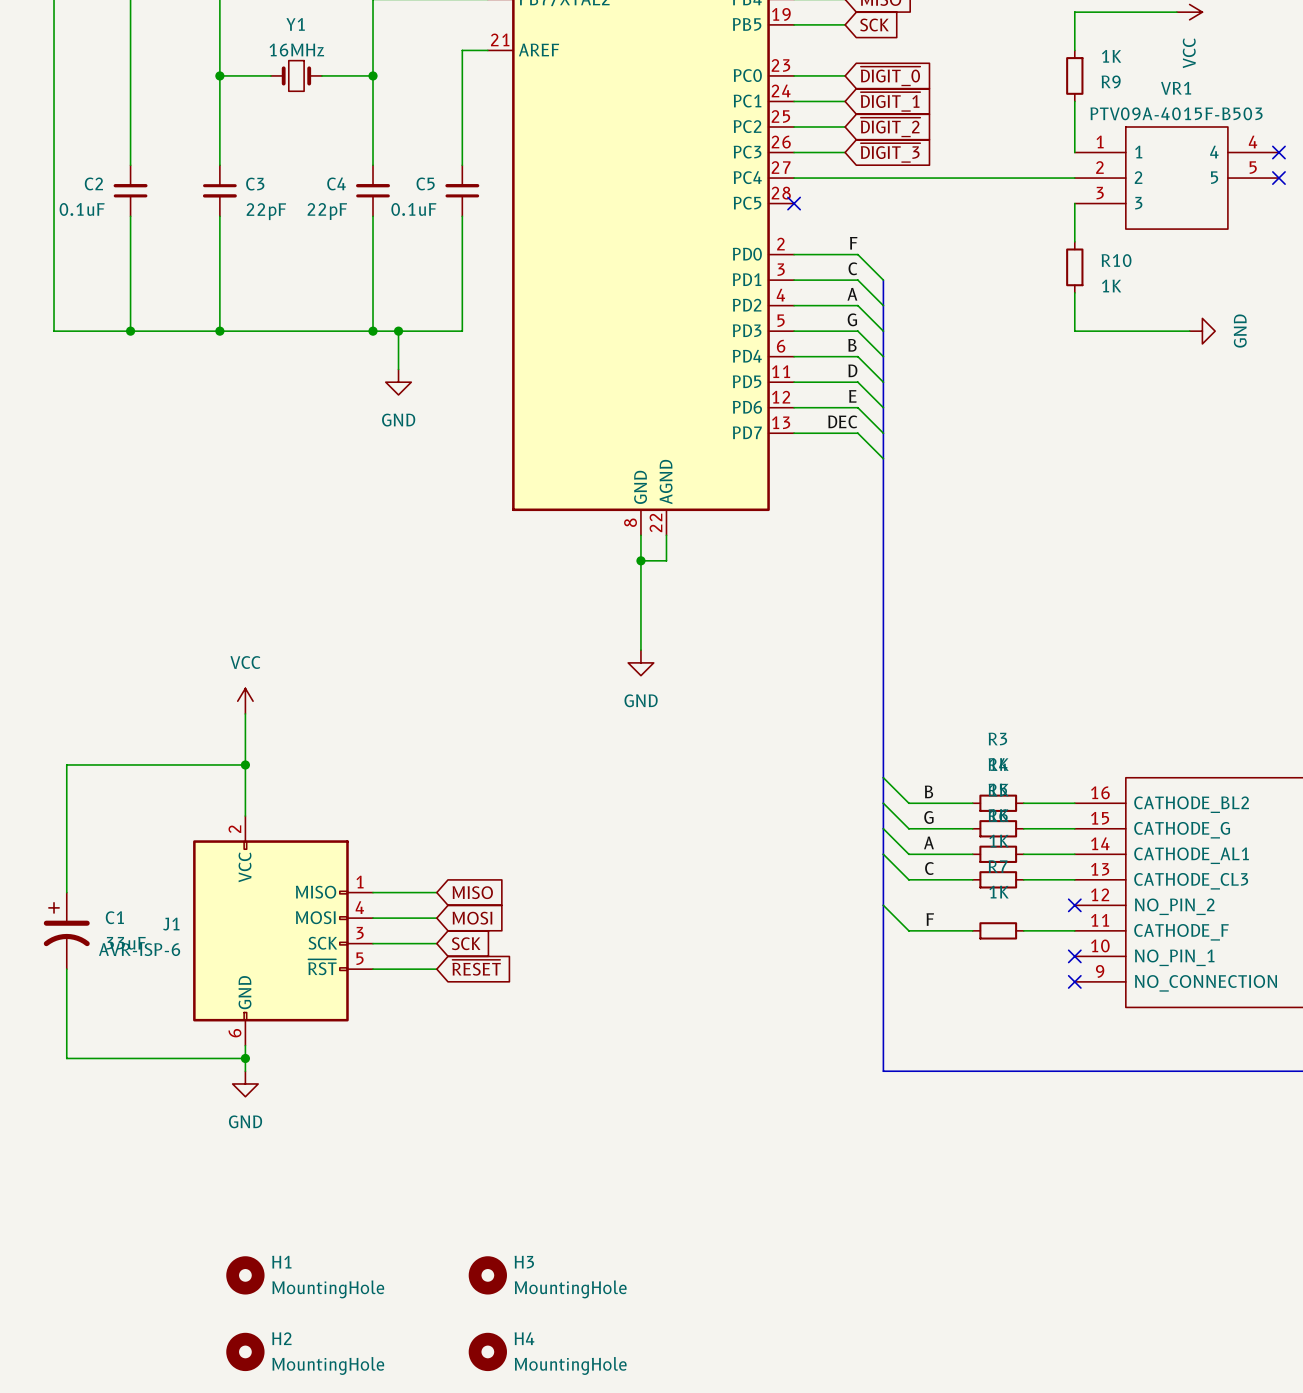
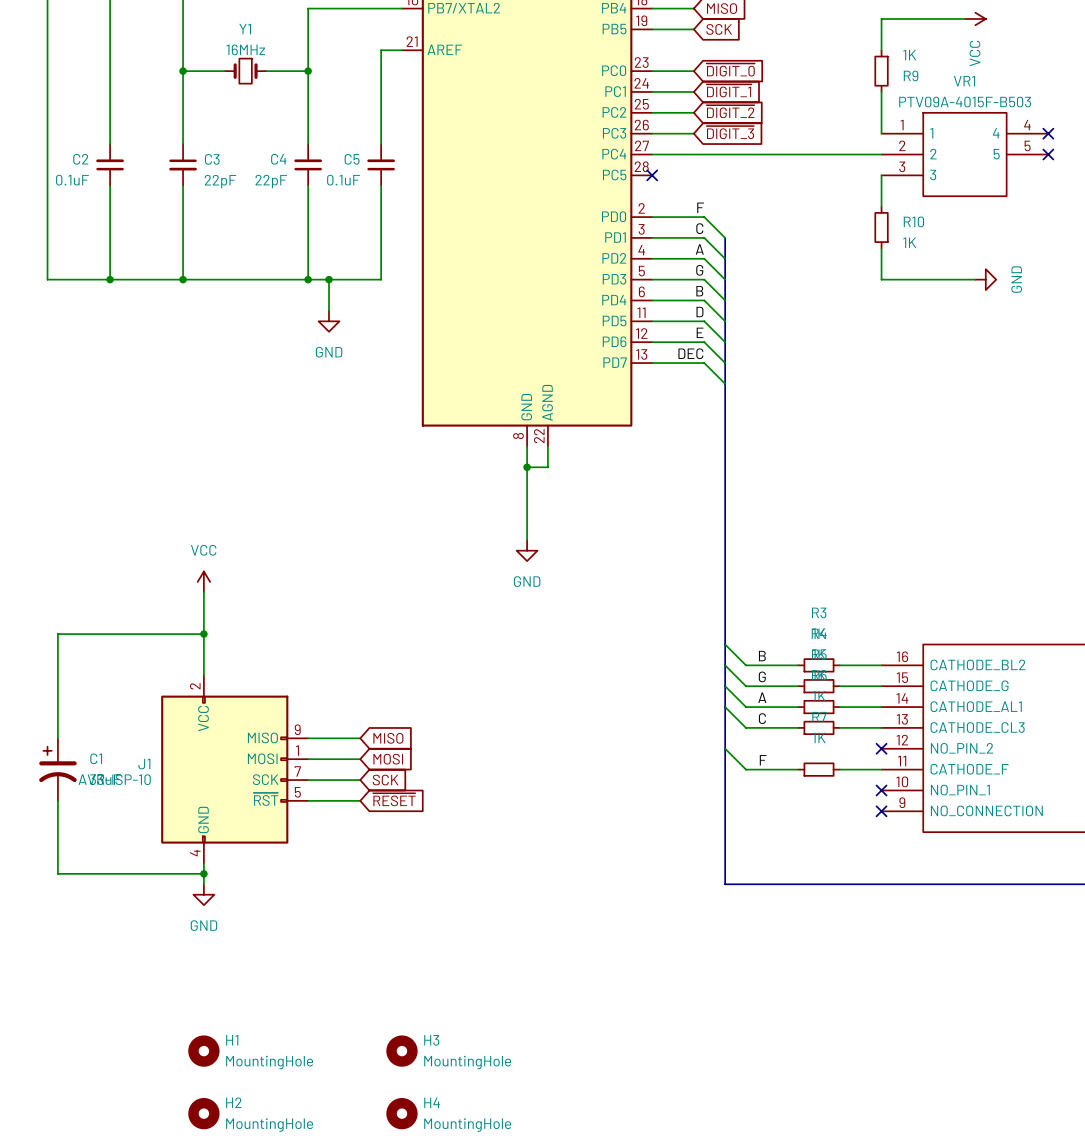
J1 pin number: 1 (360, 882) -> 9 (297, 729)
J1 pin number: 4 (359, 907) -> 1 (297, 750)
J1 pin number: 3 (360, 933) -> 7 (297, 771)
J1 value: AVR-ISP-6 (139, 949) -> AVR-ISP-10 (114, 779)
J1 pin number: 6 (234, 1033) -> 4 (195, 853)

